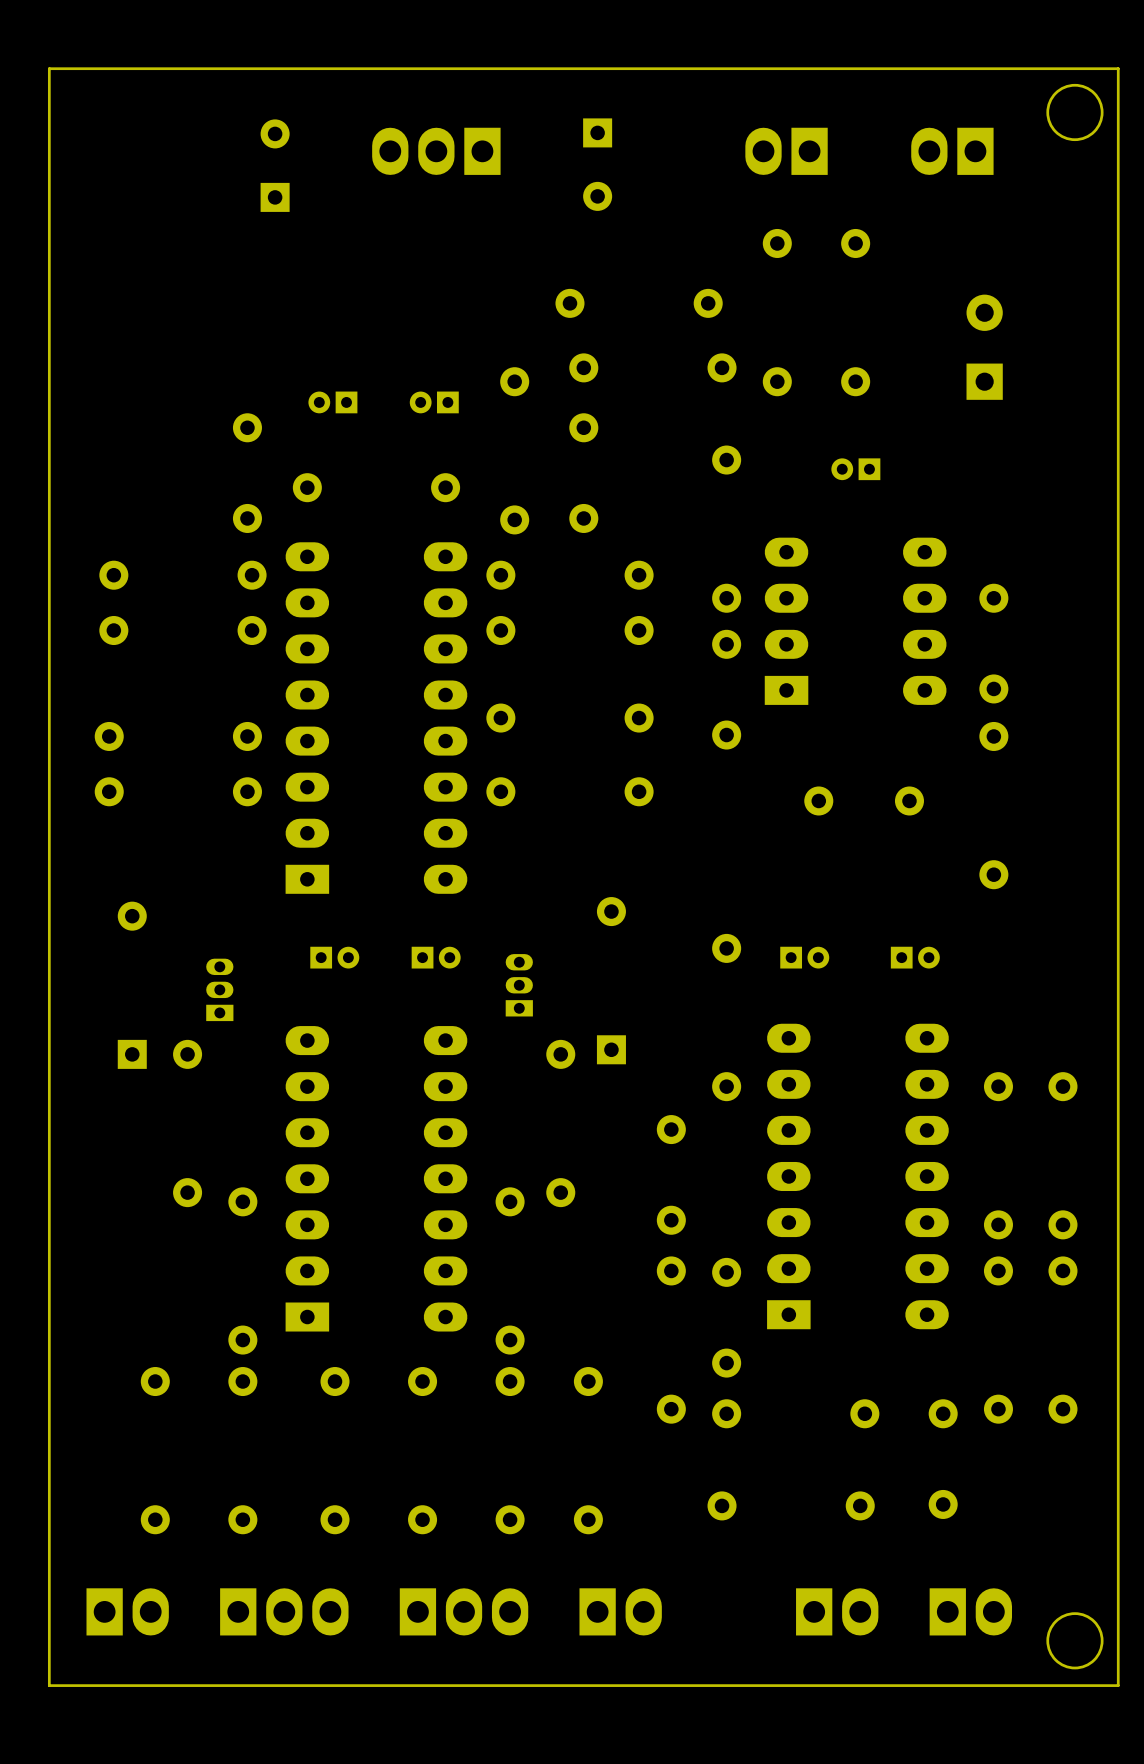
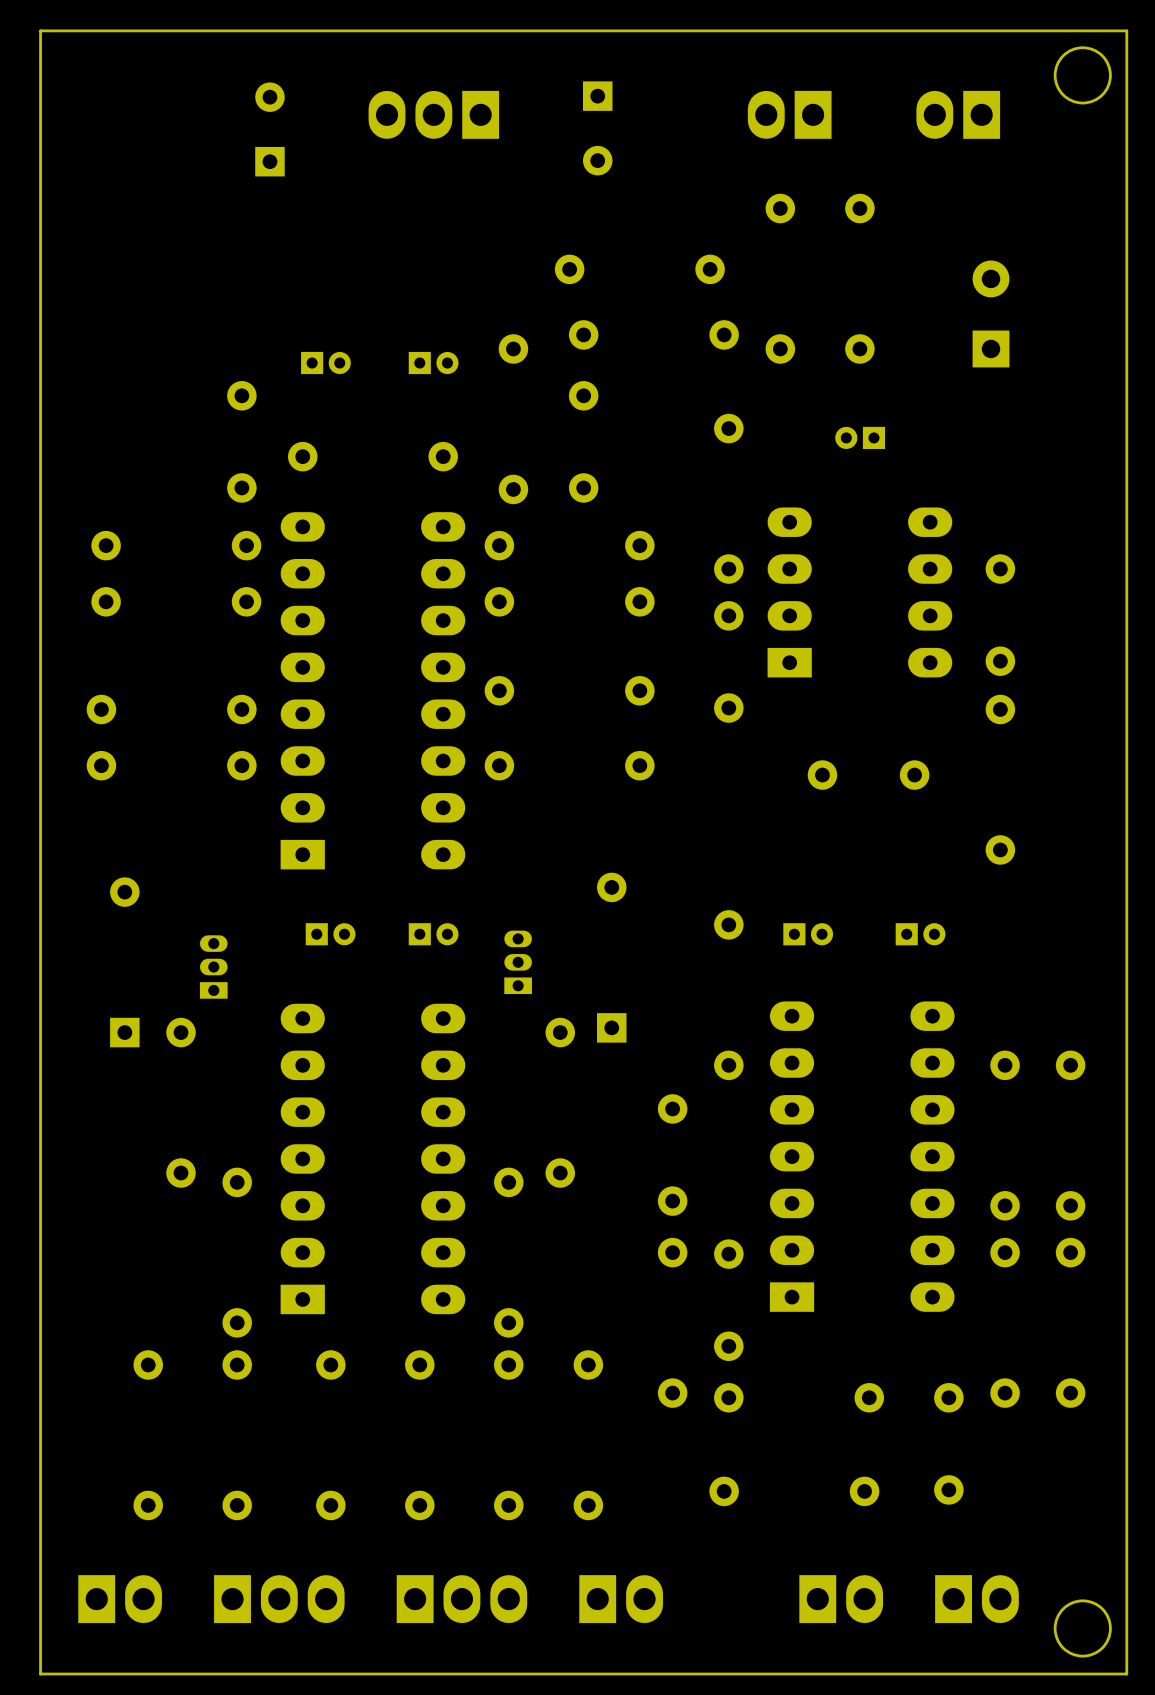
part rotation: 0° (332, 402) -> 180° (325, 363)
part rotation: 0° (434, 402) -> 180° (433, 363)

